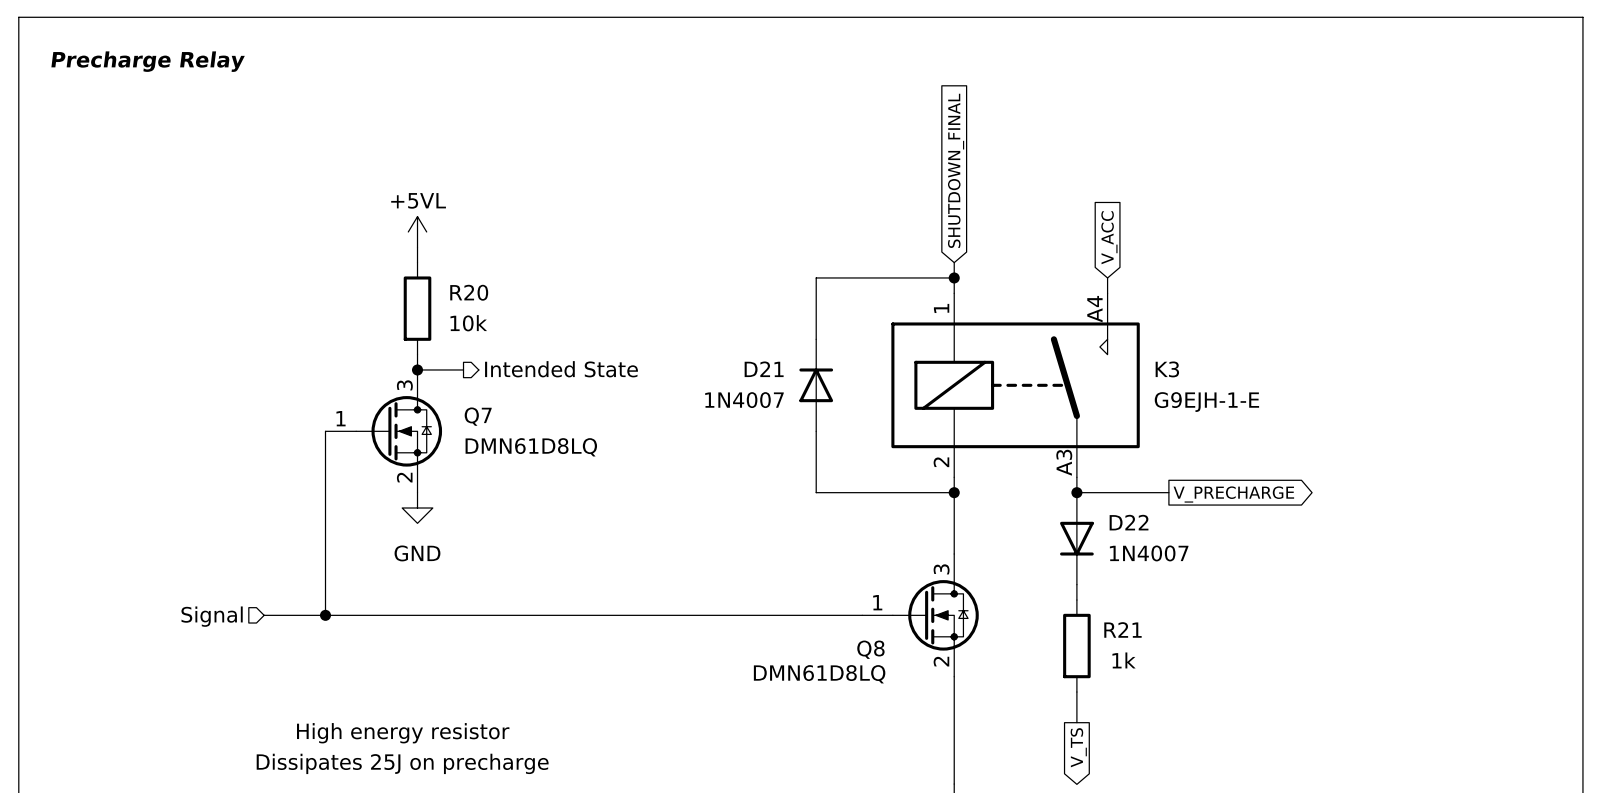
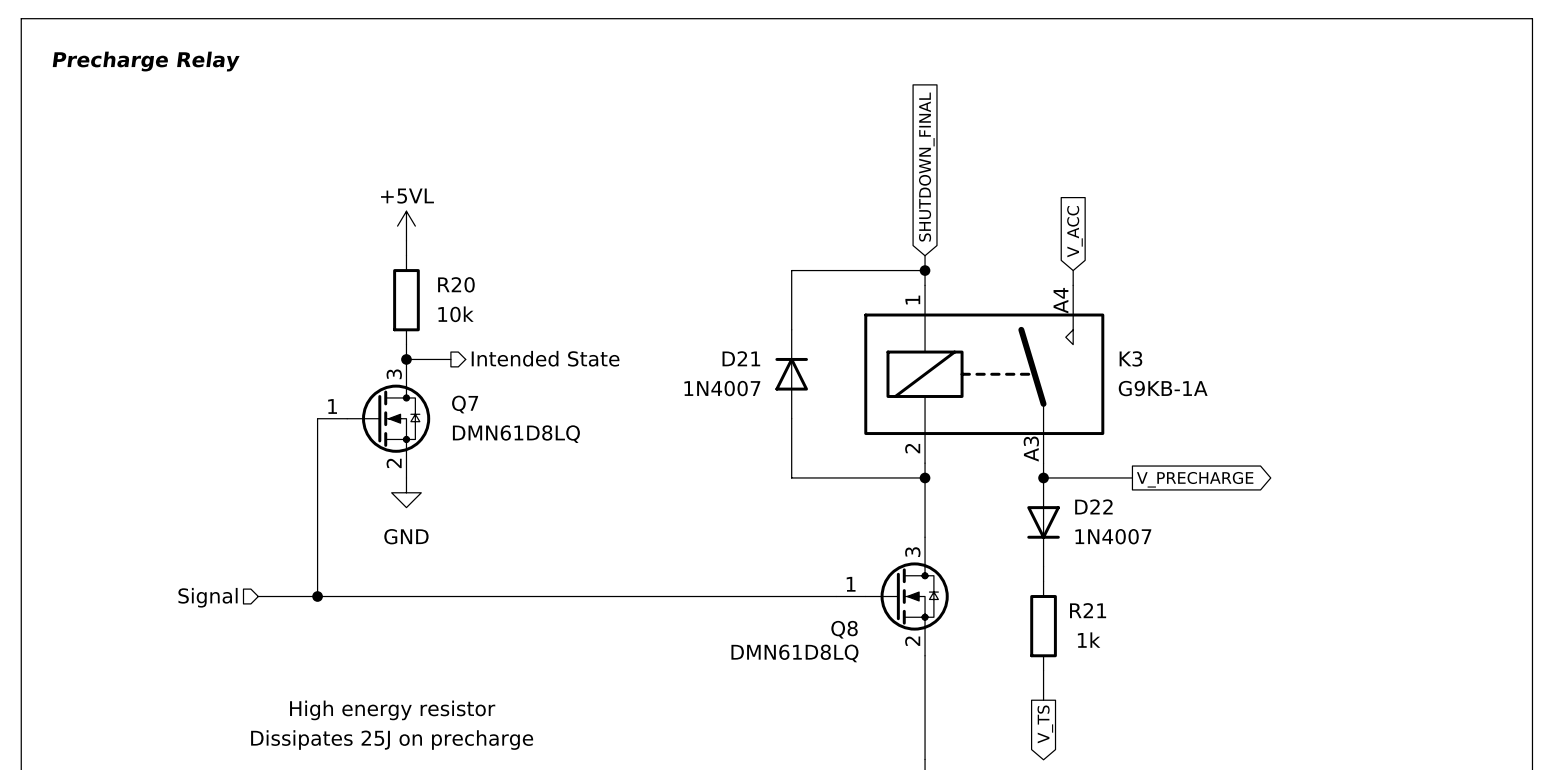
K3 value: G9EJH-1-E (1206, 402) -> G9KB-1A (1163, 388)

